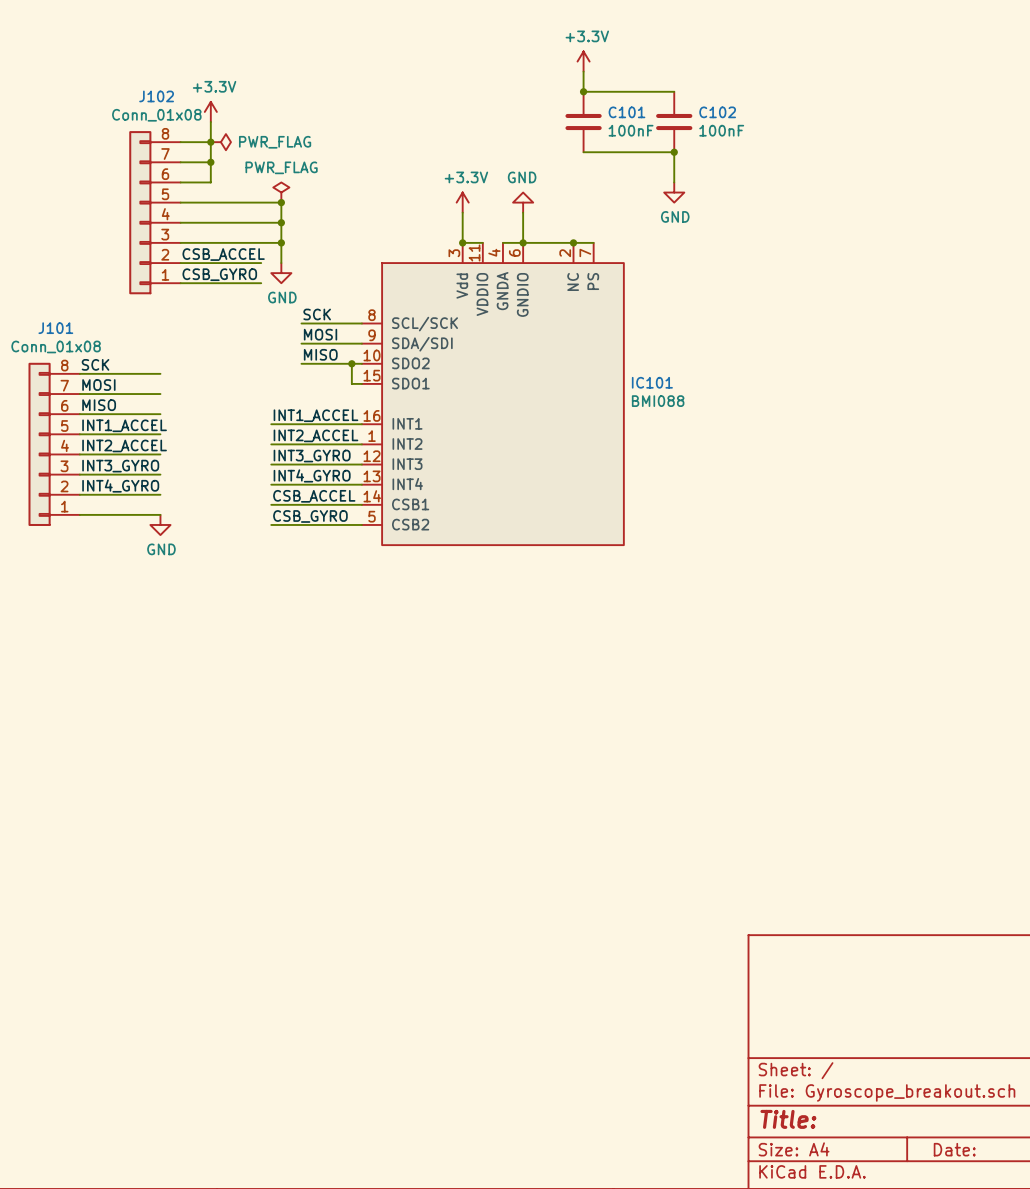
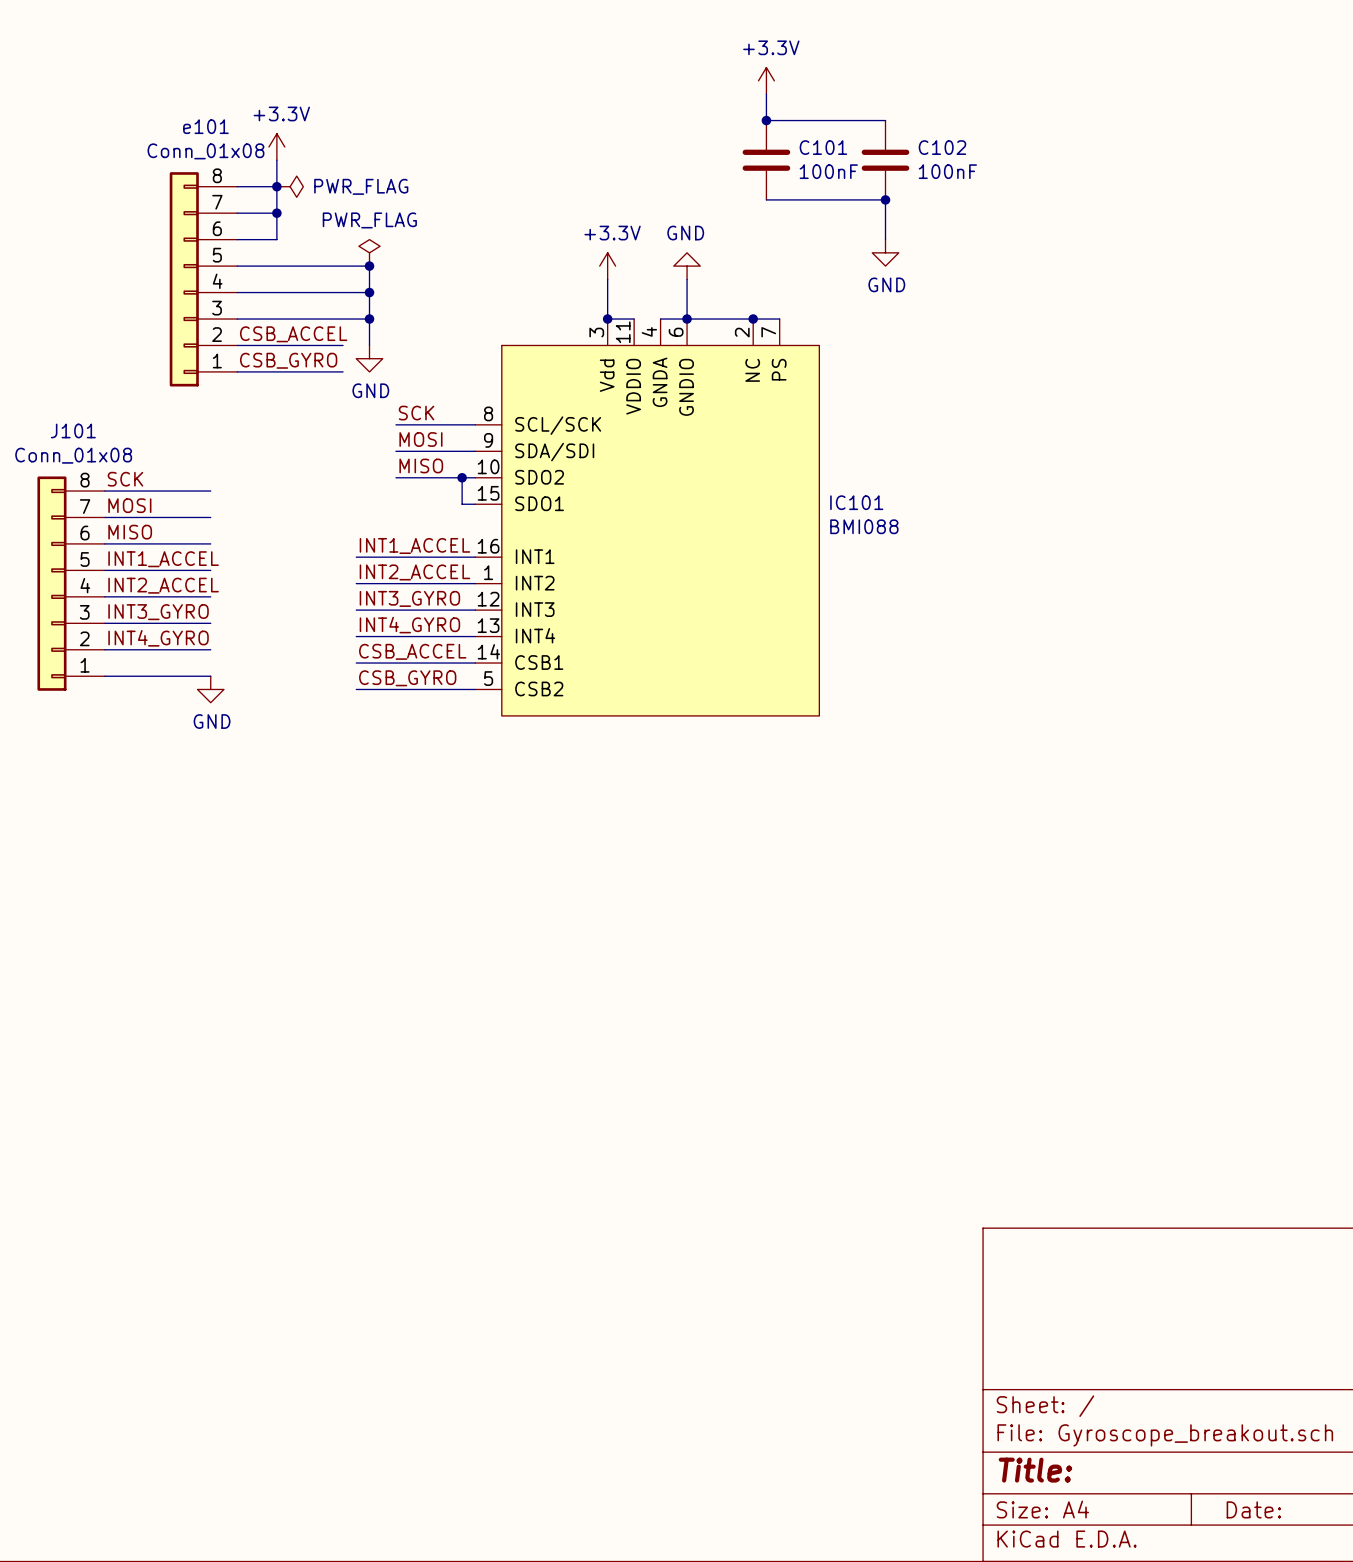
J102 name: J102 (156, 96) -> e101 (205, 126)

